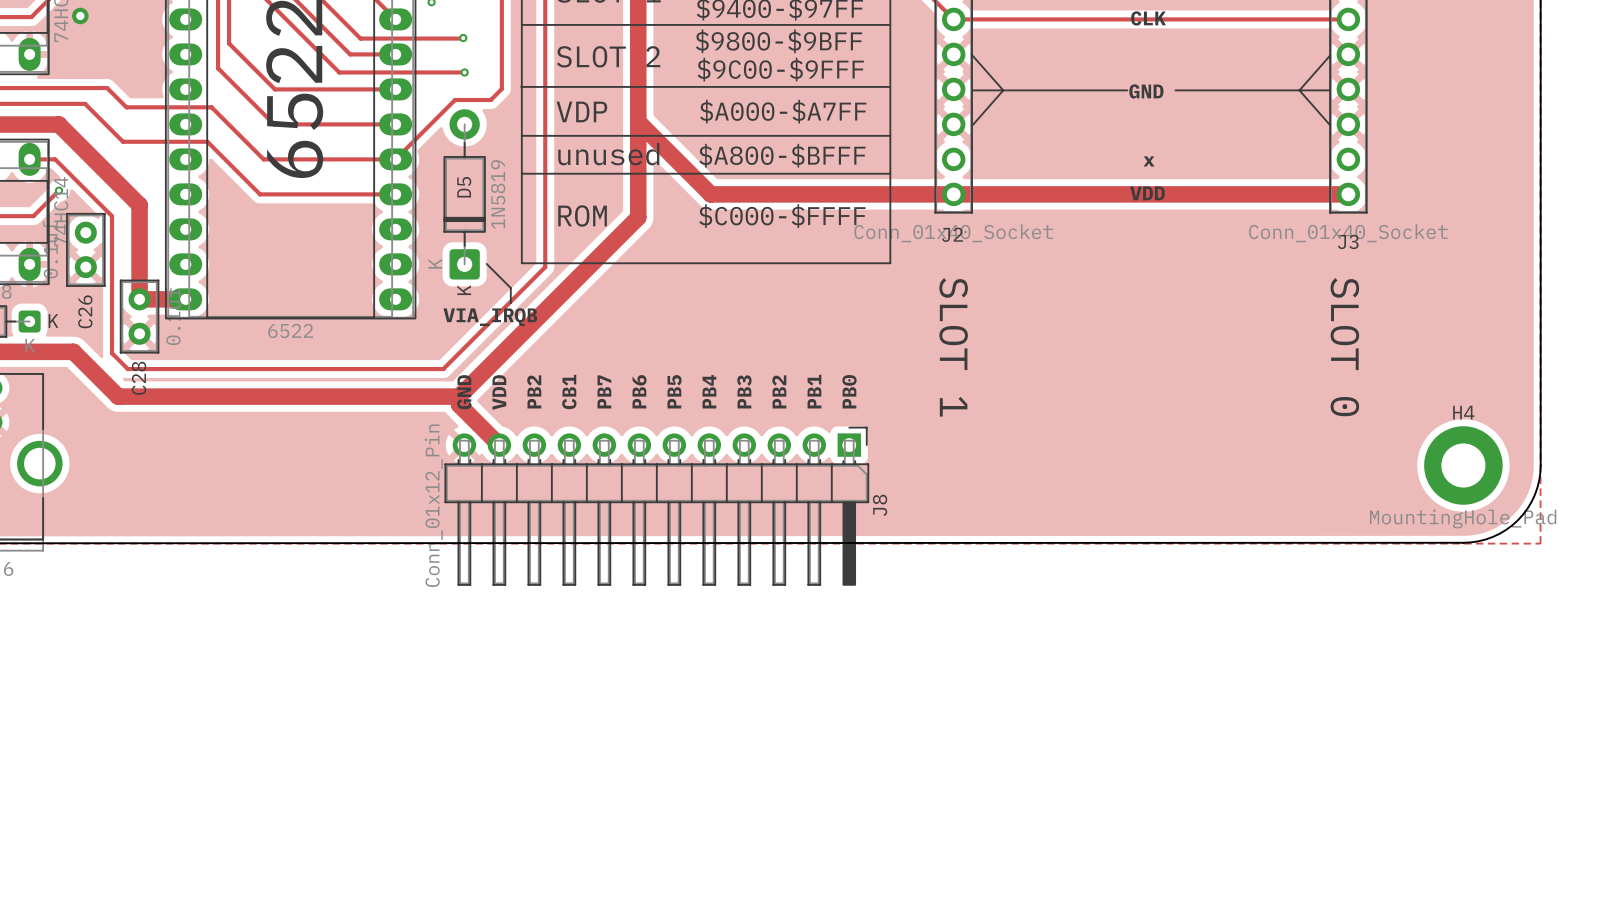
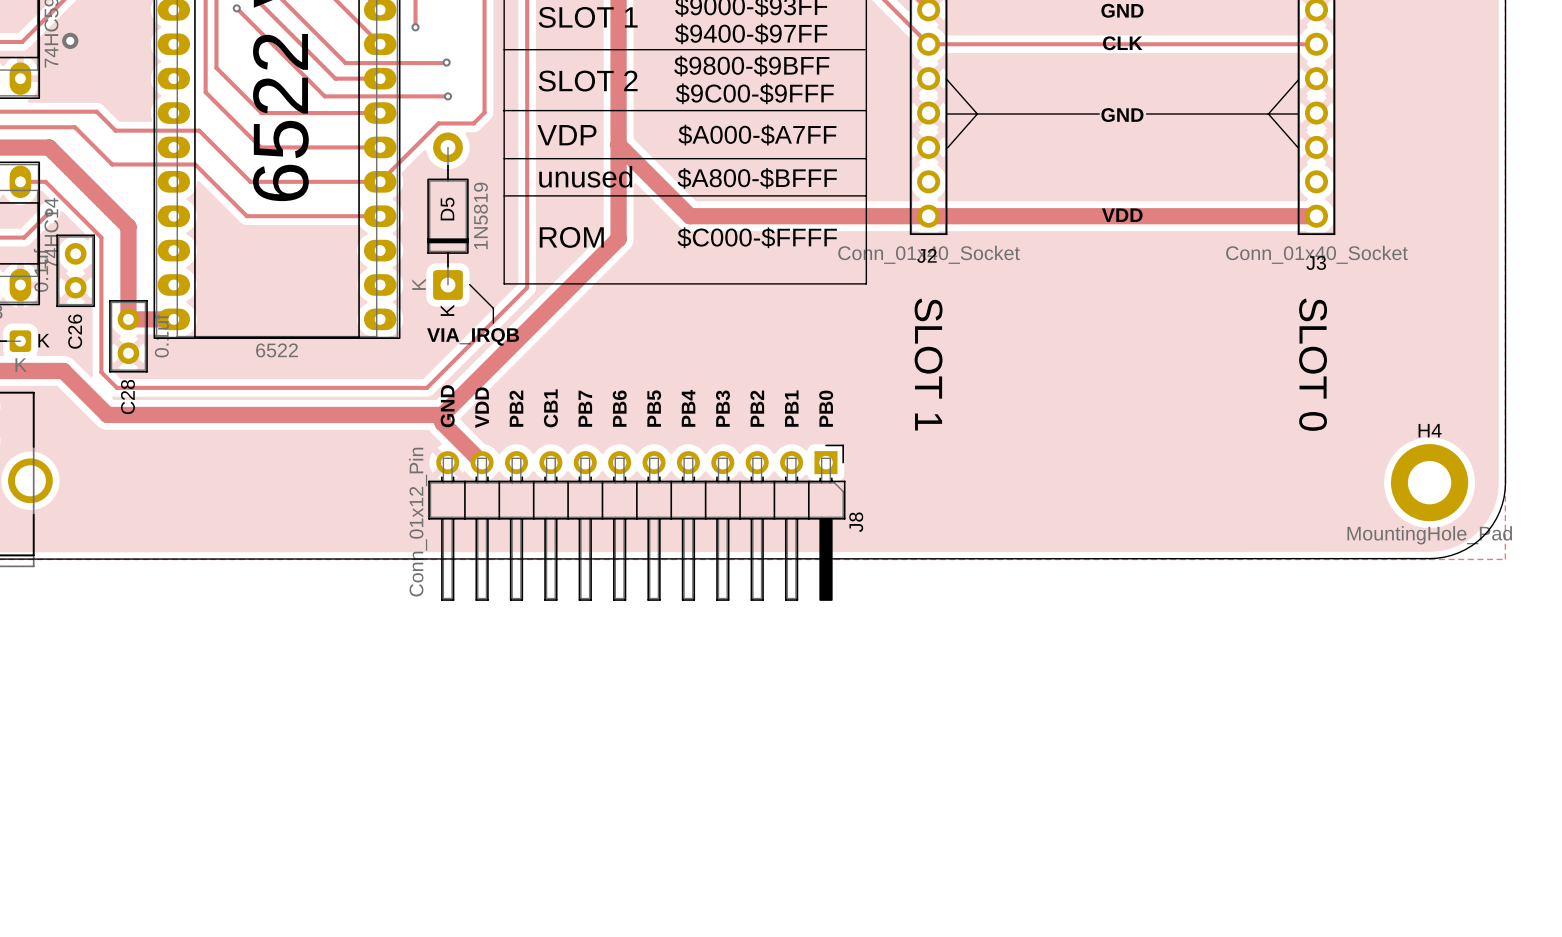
text: x (1149, 161) -> none

